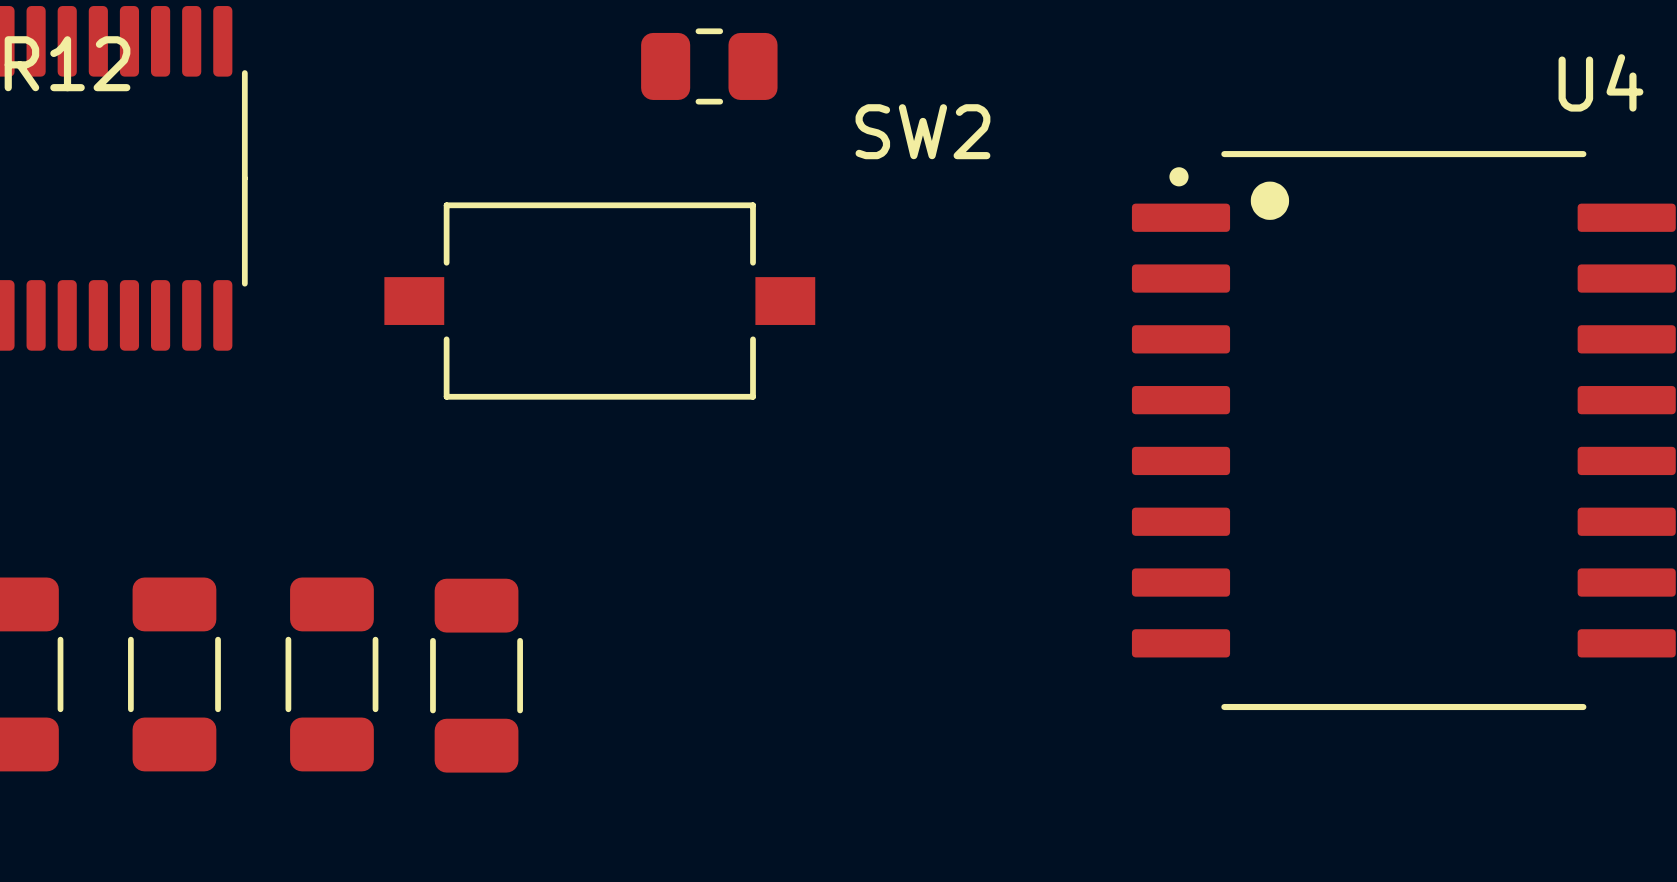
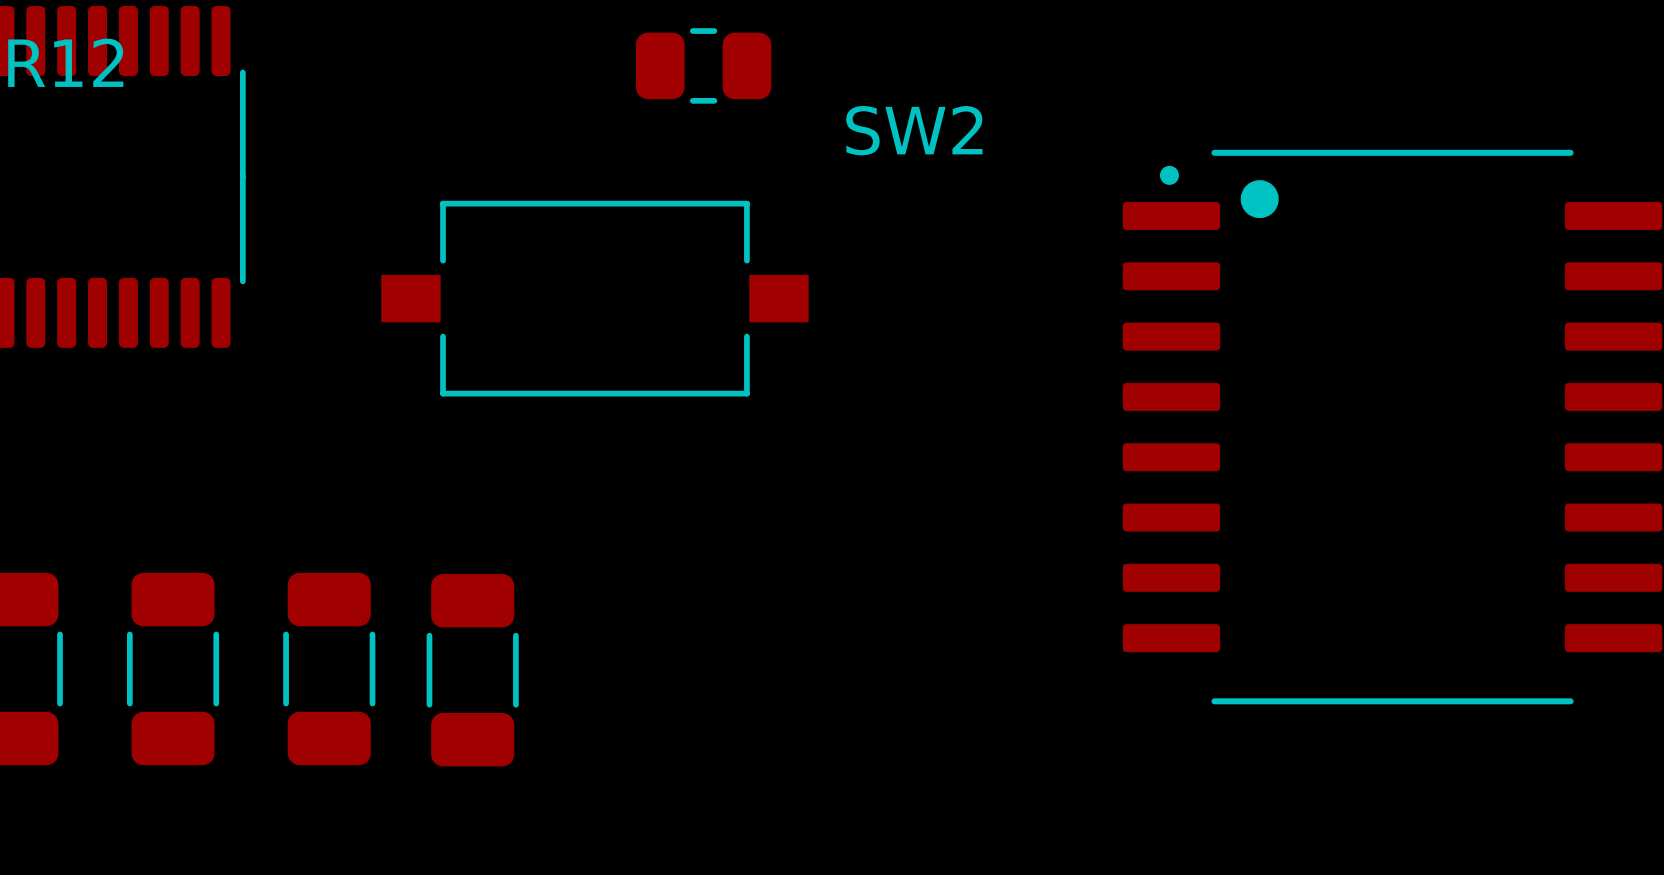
U4 name: U4 (1600, 82) -> none

